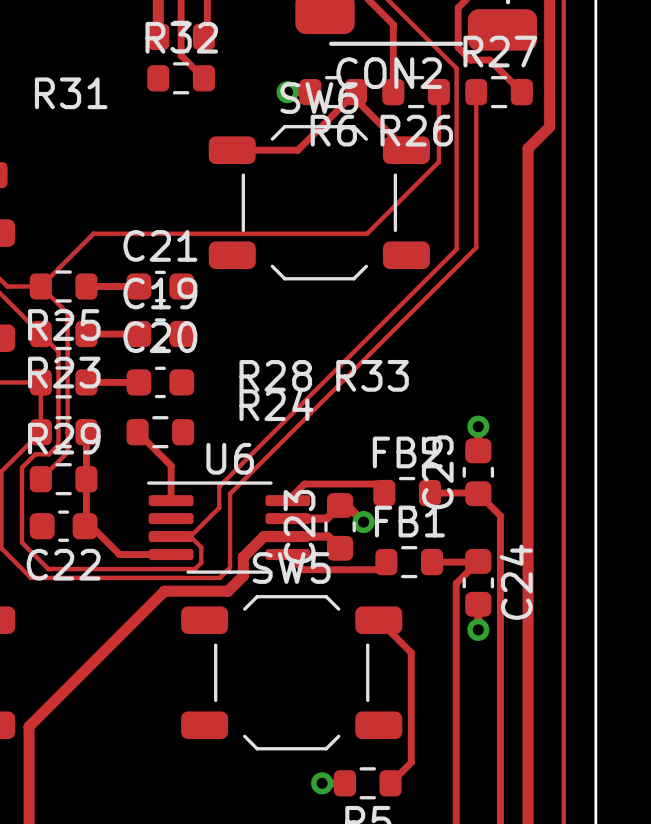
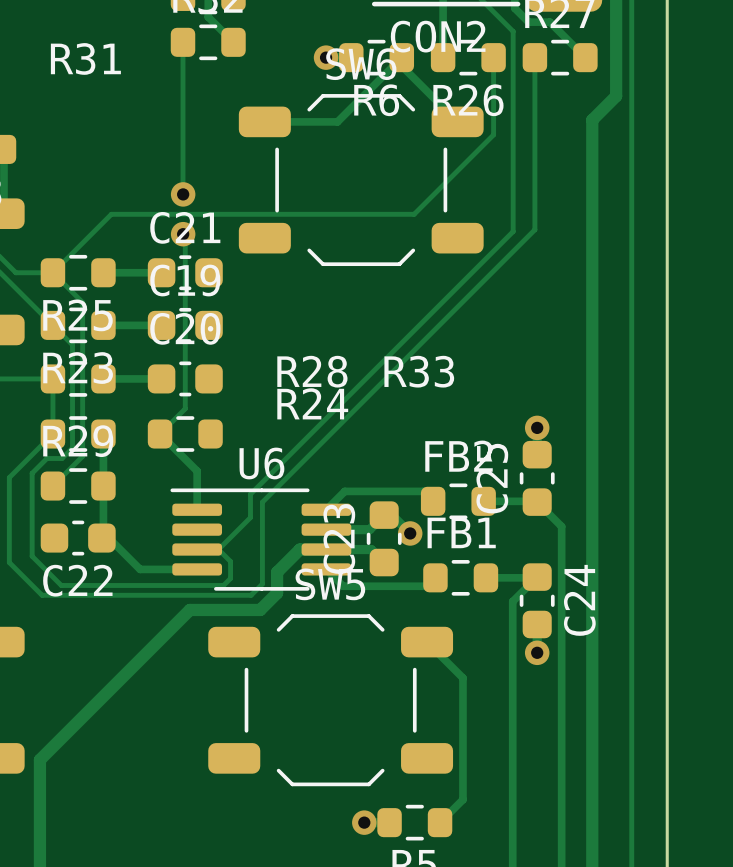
track: none -> (183, 42) (183, 194)
via: none -> (183, 194)
track: none -> (183, 234) (185, 236) (185, 408) (160, 434)
via: none -> (183, 234)

